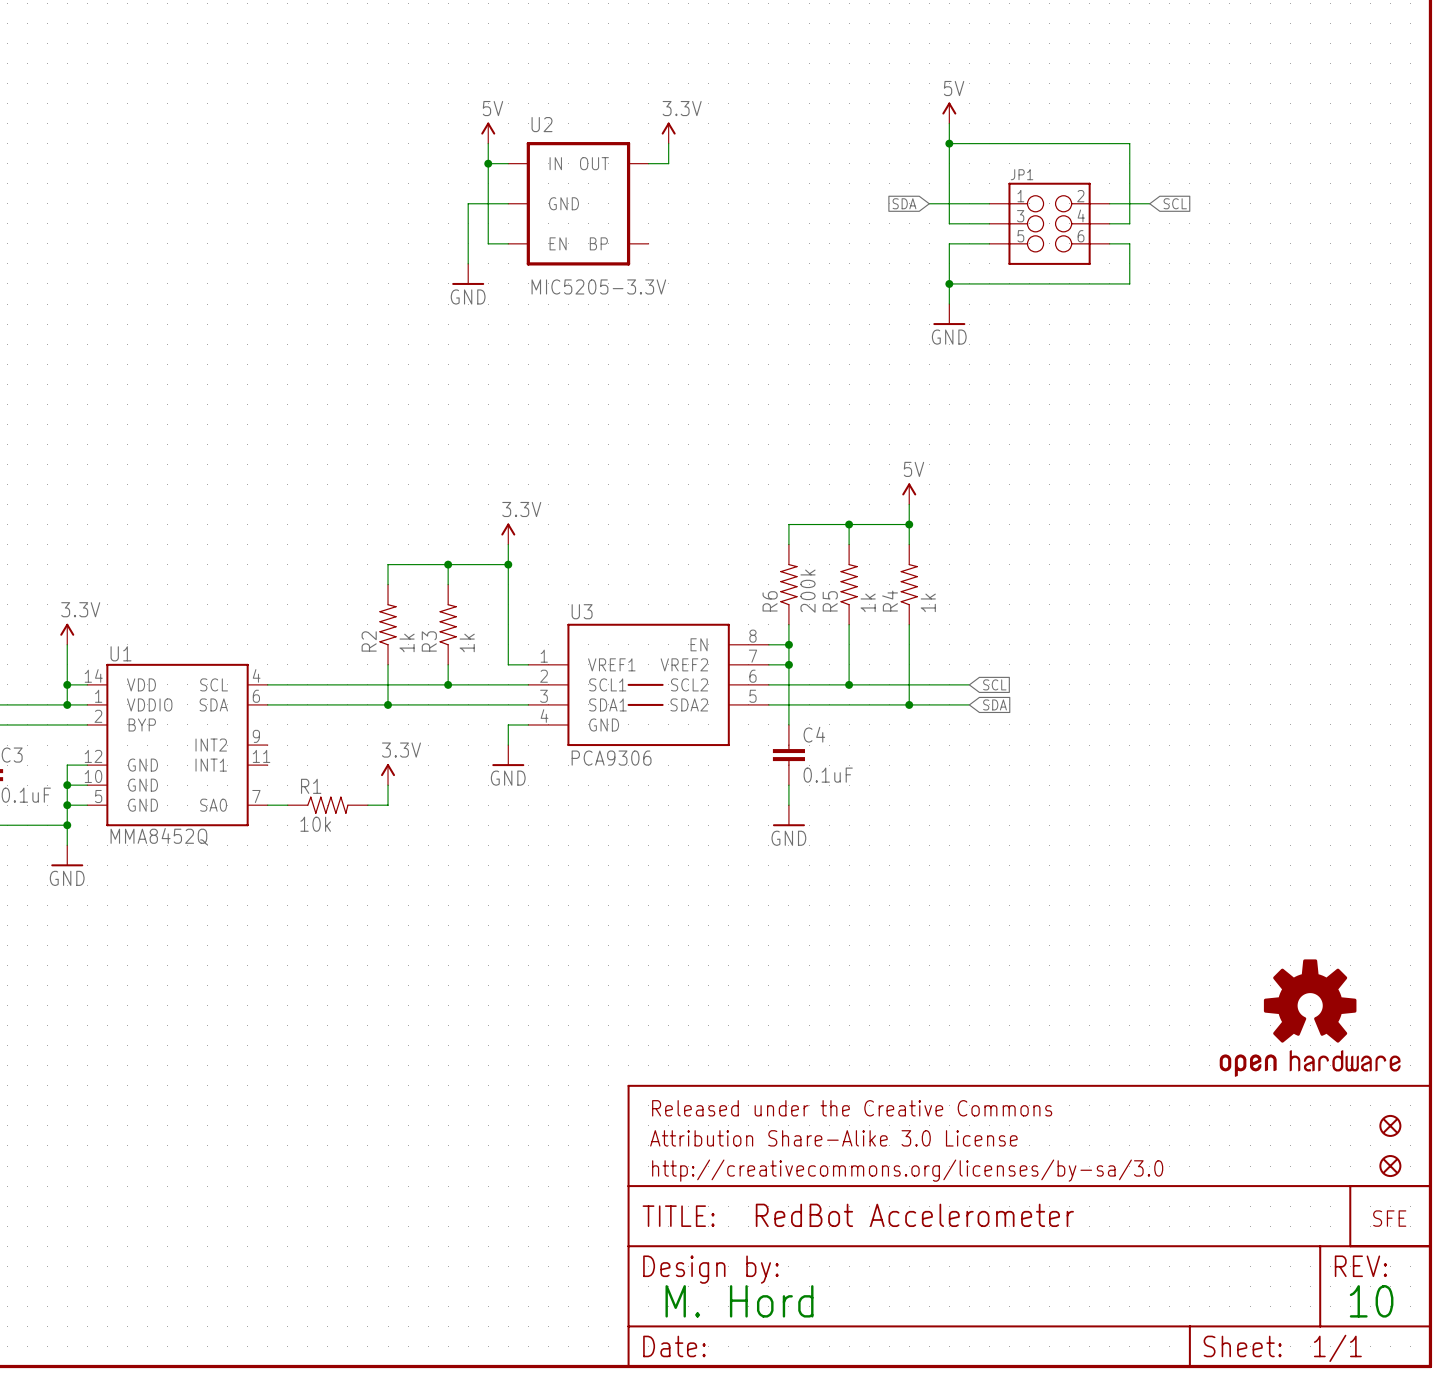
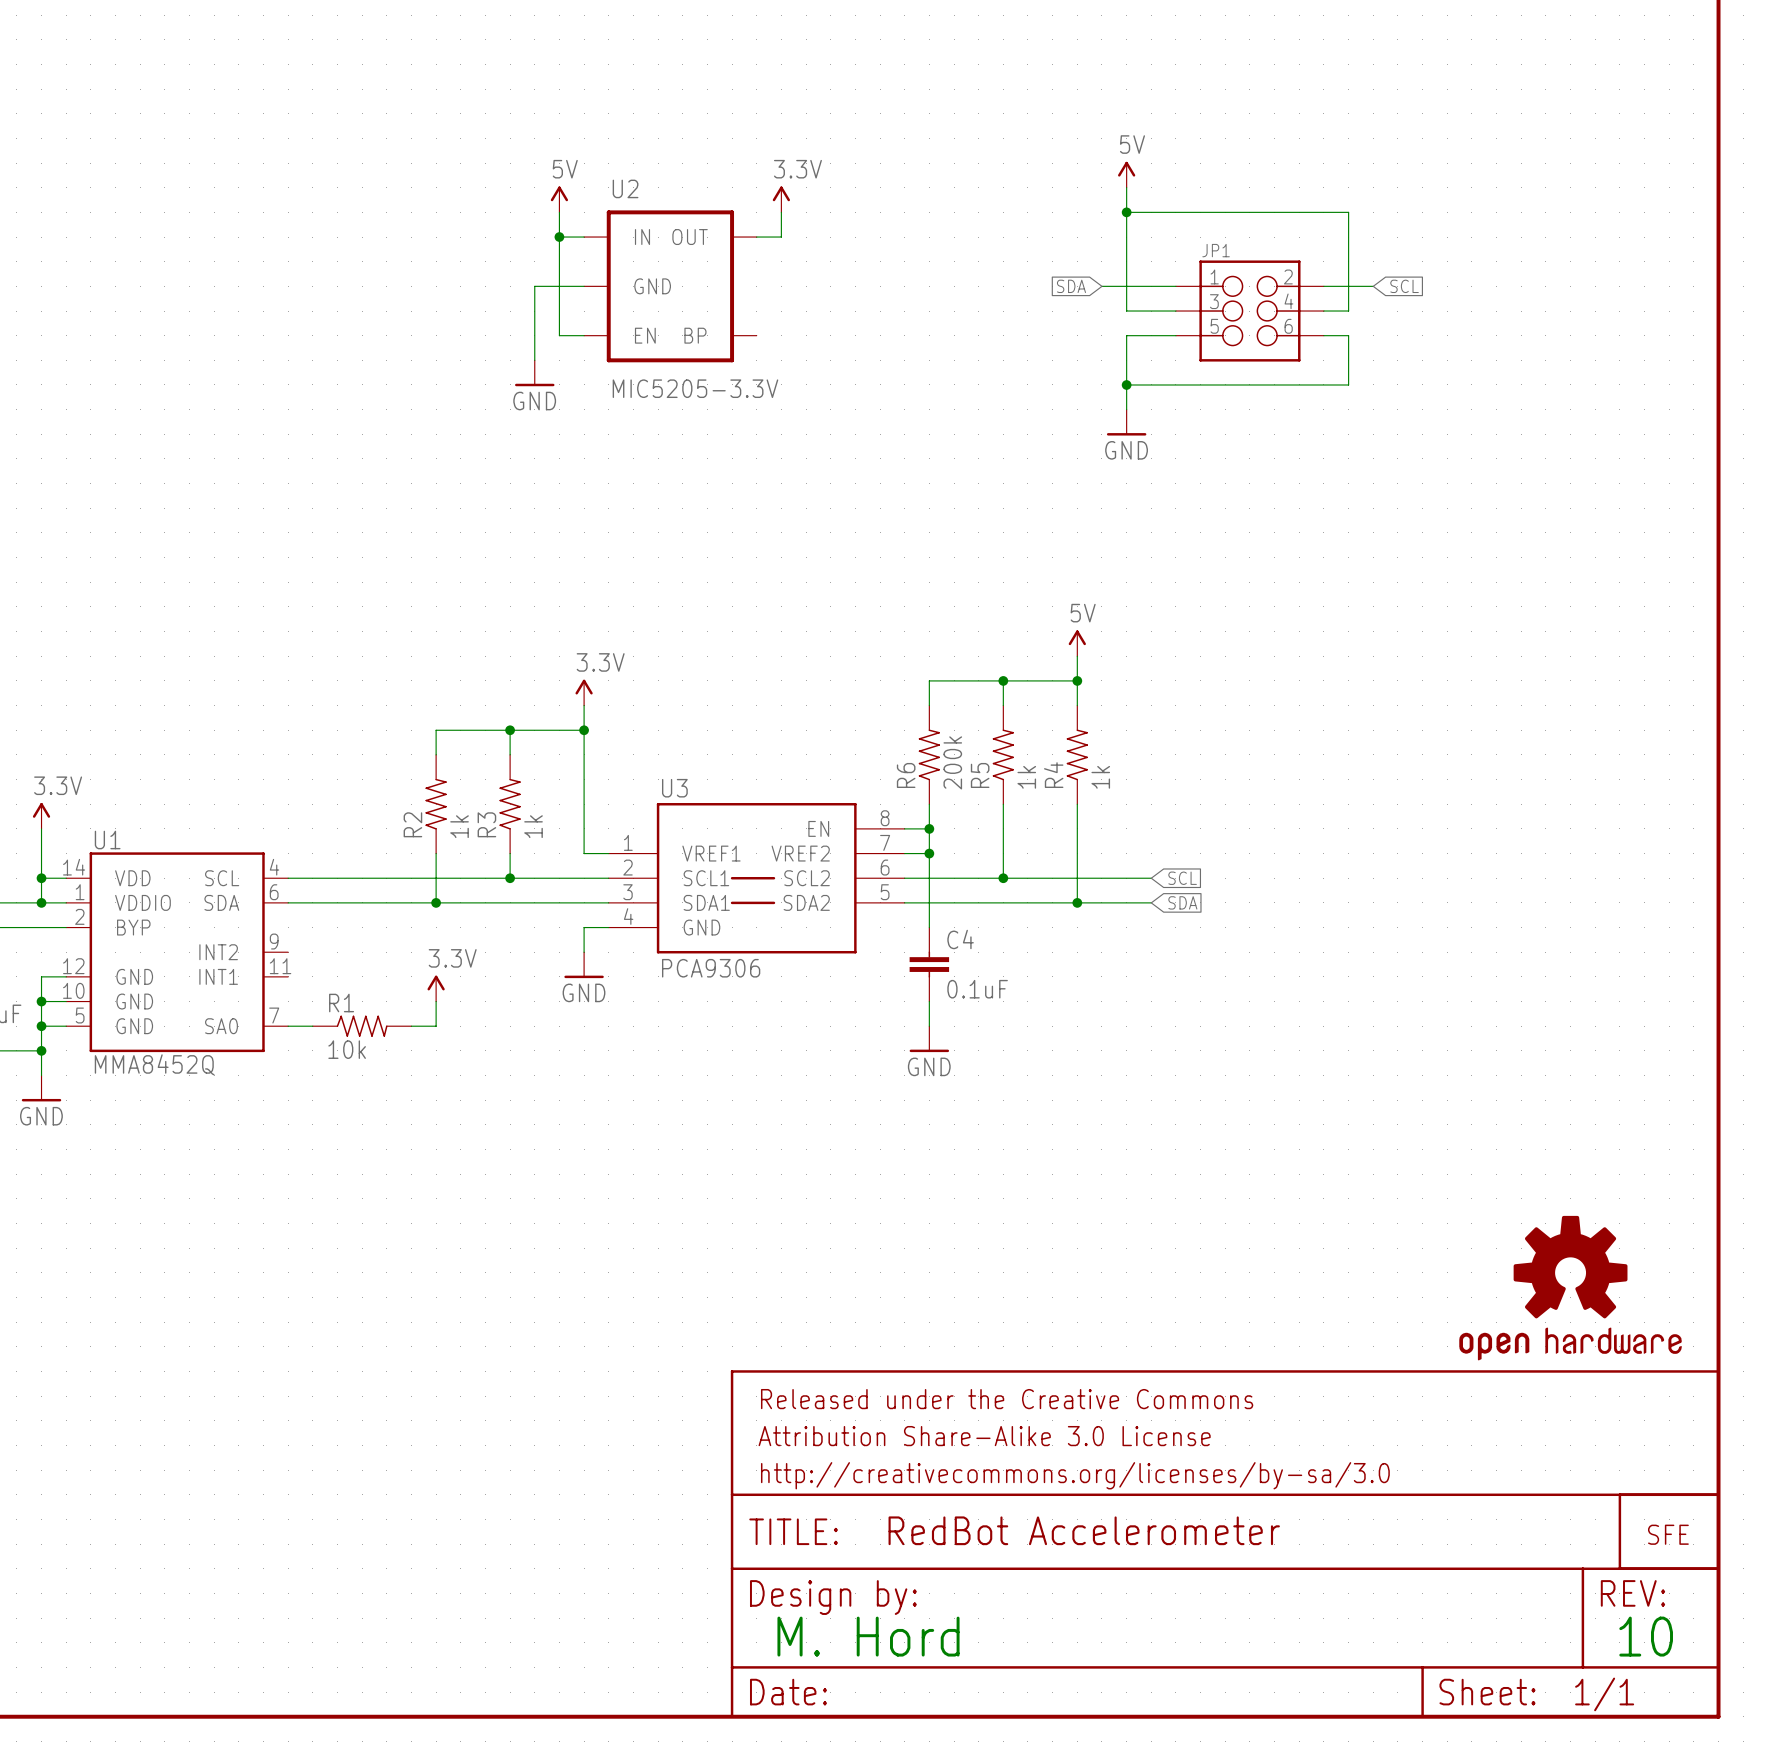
part: (1390, 1125) -> none
part: (1390, 1166) -> none

